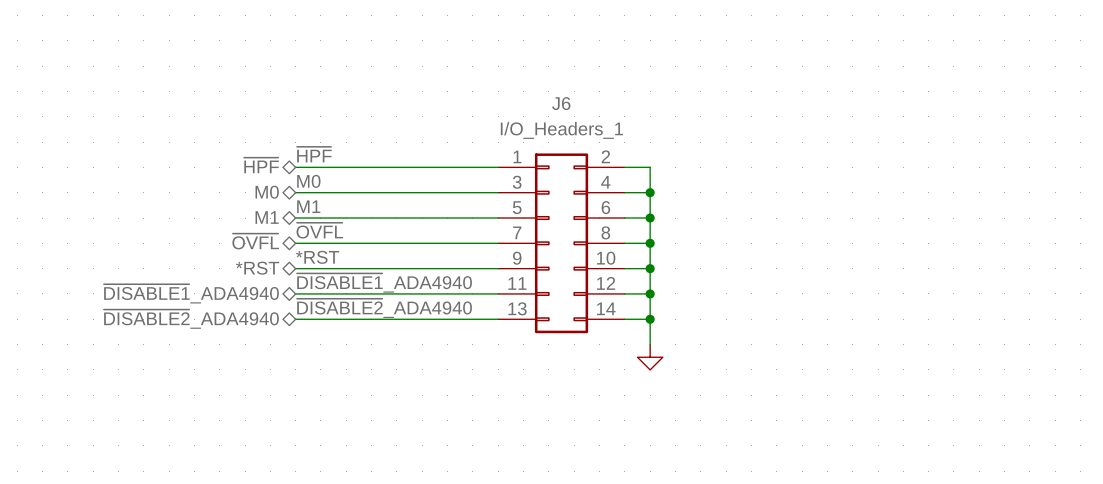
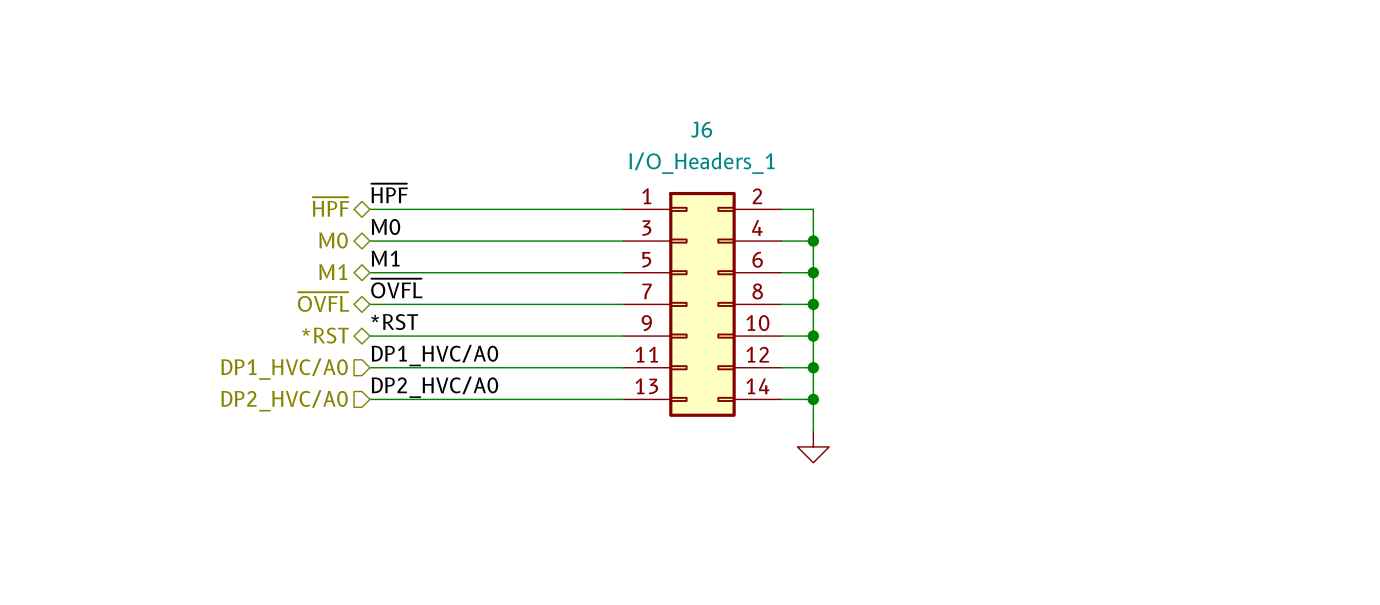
label: ~{DISABLE1}_ADA4940 (384, 283) -> DP1_HVC/A0 (434, 355)
hierarchical label shape: bidirectional (191, 293) -> input (284, 369)
hierarchical label: ~{DISABLE1}_ADA4940 (191, 293) -> DP1_HVC/A0 (284, 369)
label: ~{DISABLE2}_ADA4940 (384, 308) -> DP2_HVC/A0 (434, 387)
hierarchical label shape: bidirectional (191, 319) -> input (284, 400)
hierarchical label: ~{DISABLE2}_ADA4940 (191, 319) -> DP2_HVC/A0 (284, 400)

